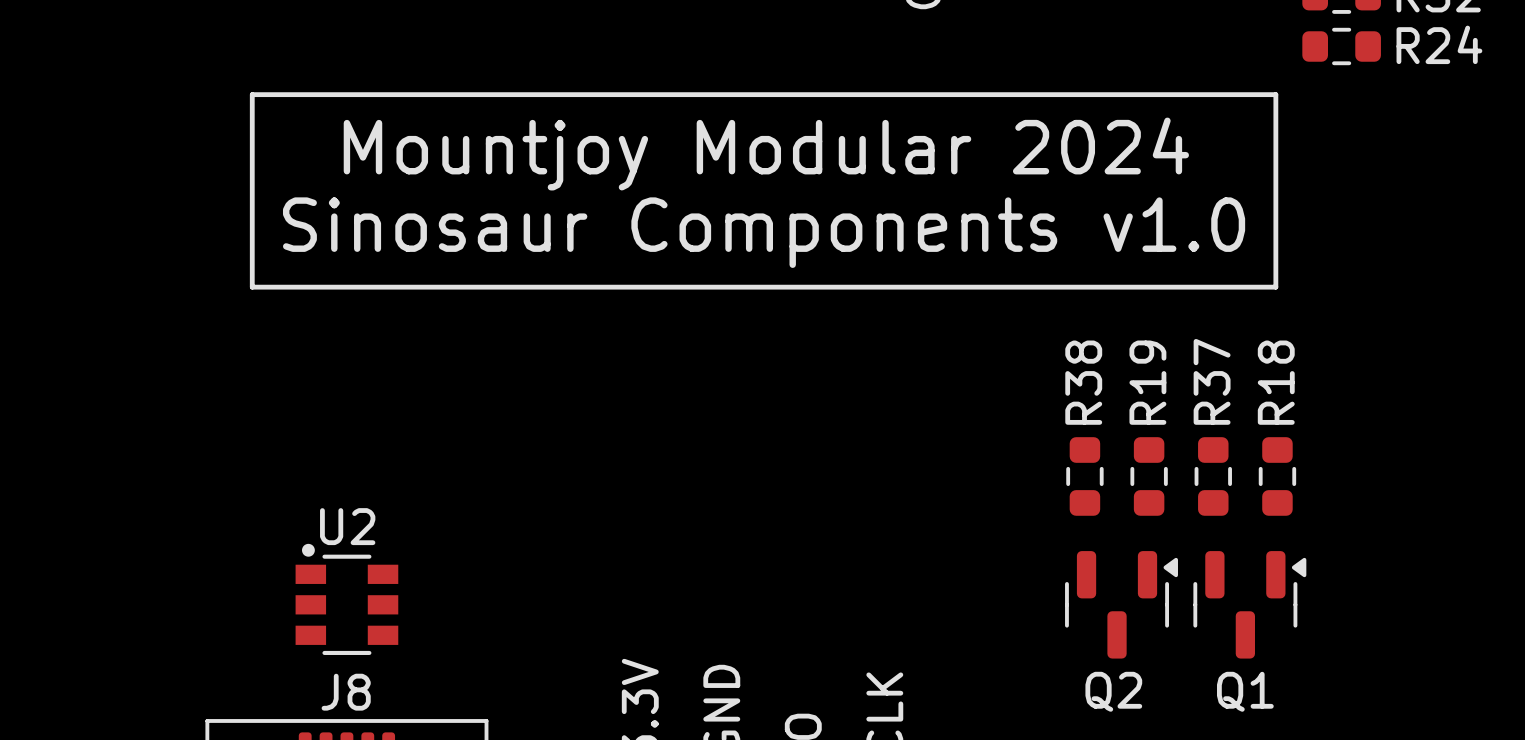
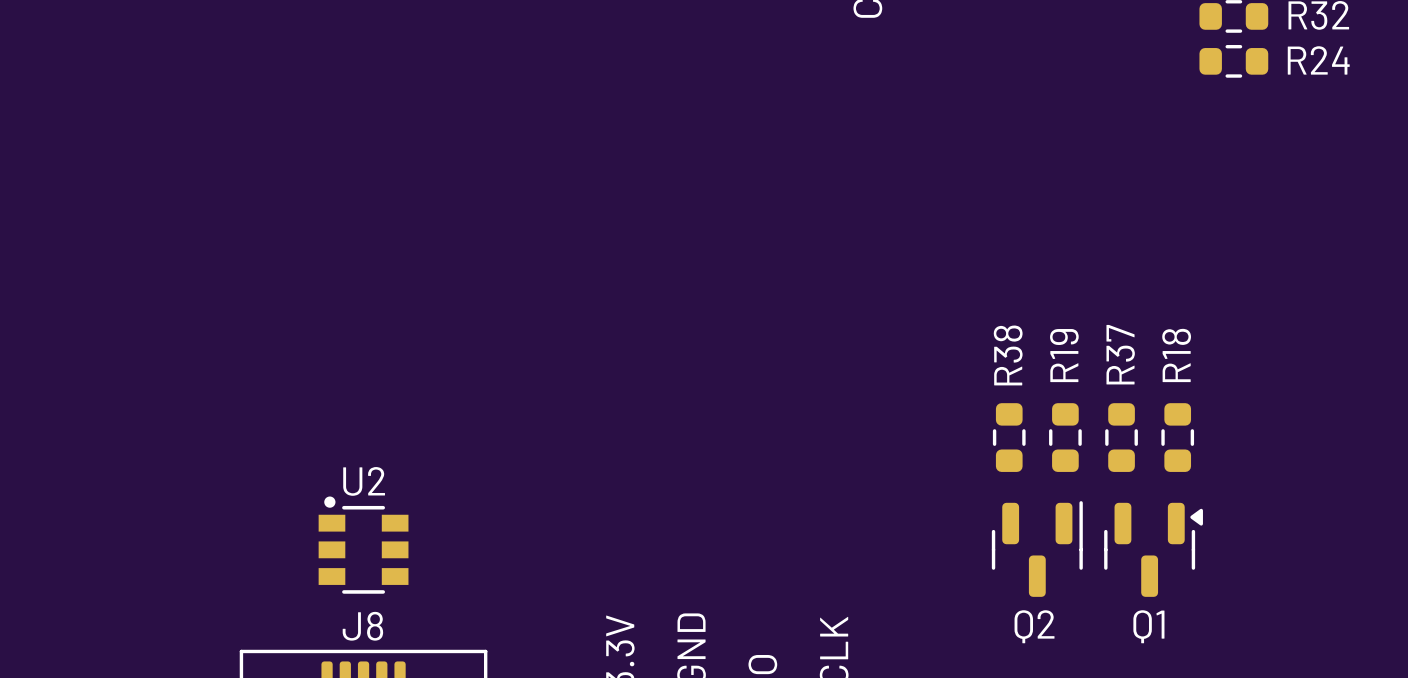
line: (252, 94) (1275, 94) (1275, 287) (252, 287) (252, 94) -> none
text: Mountjoy Modular 2024 (766, 154) -> none
text: Sinosaur Components v1.0 (764, 232) -> none
Q2 footprint: [1065, 551, 1178, 659] -> [991, 501, 1083, 597]

